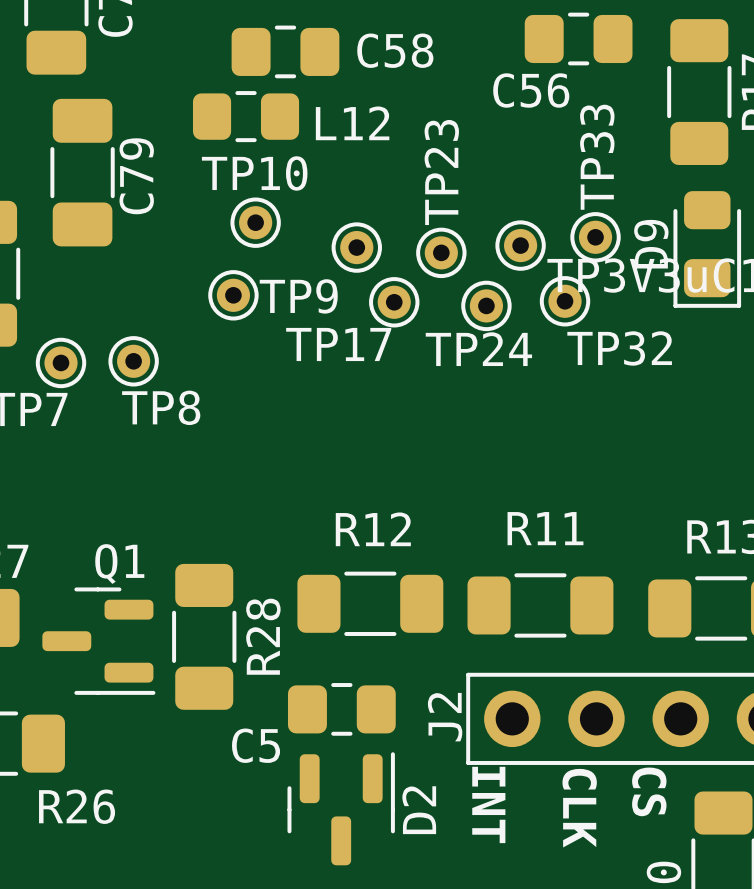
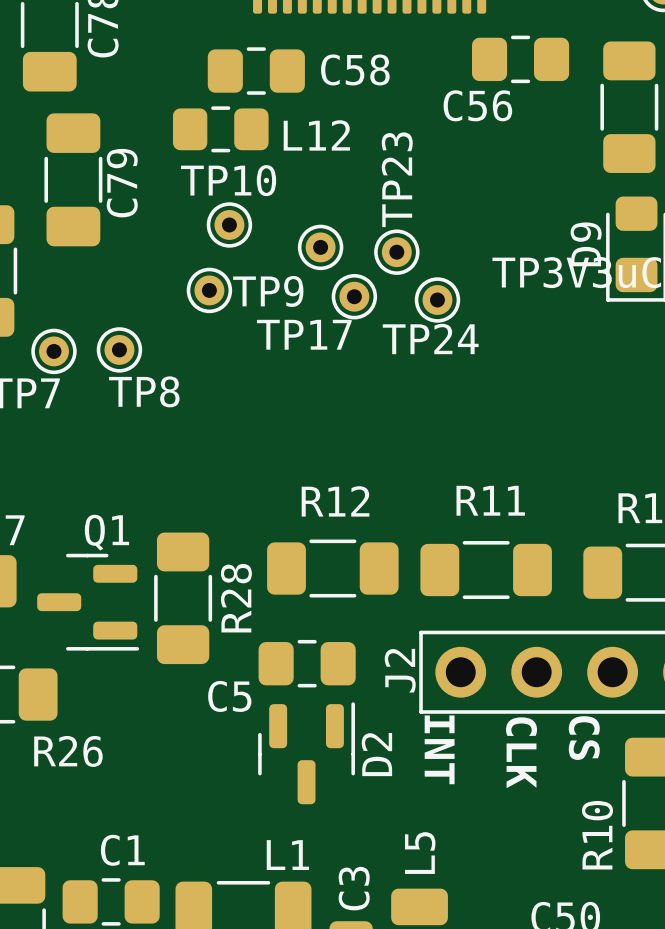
TP33: (595, 237) -> none
part: (520, 245) -> none
TP32: (565, 301) -> none

